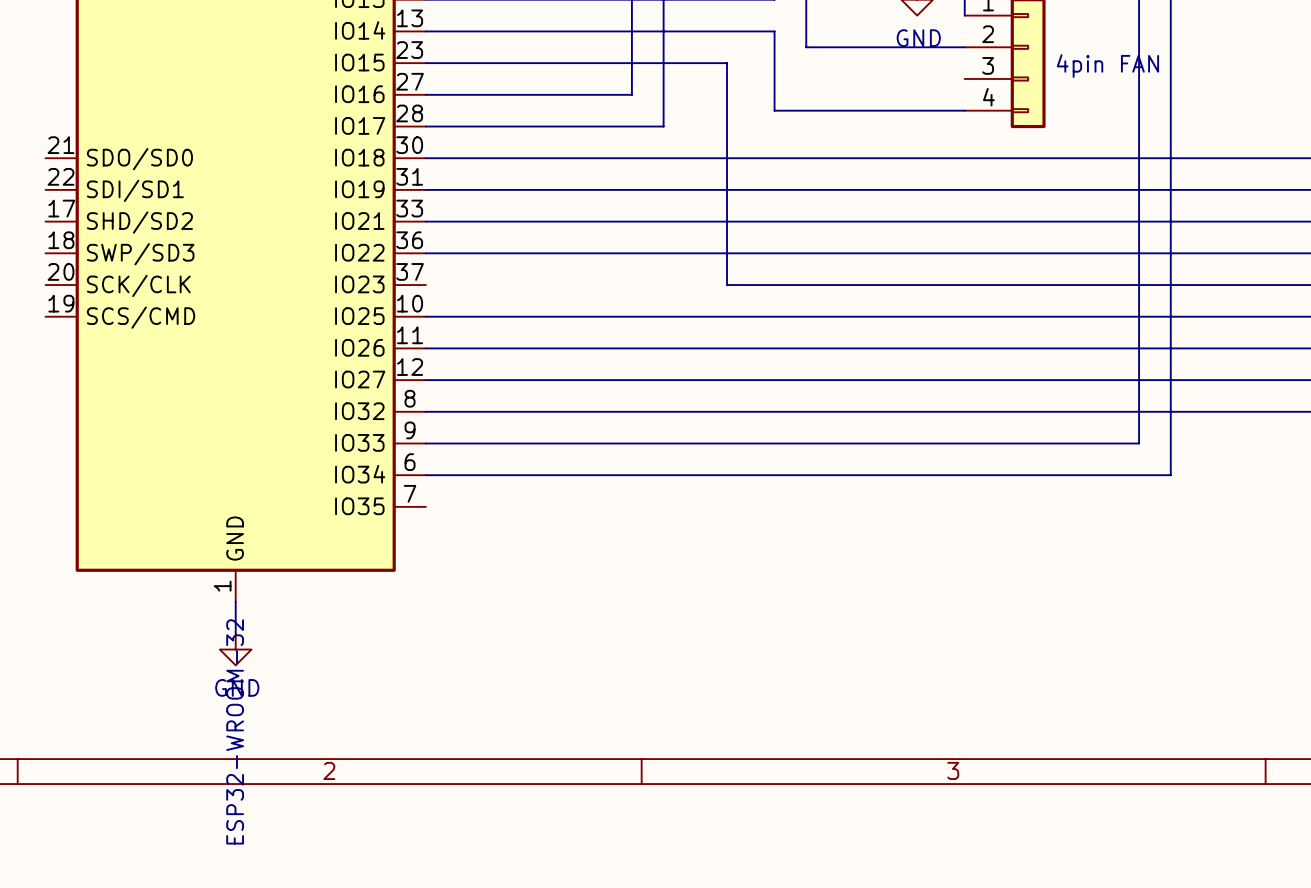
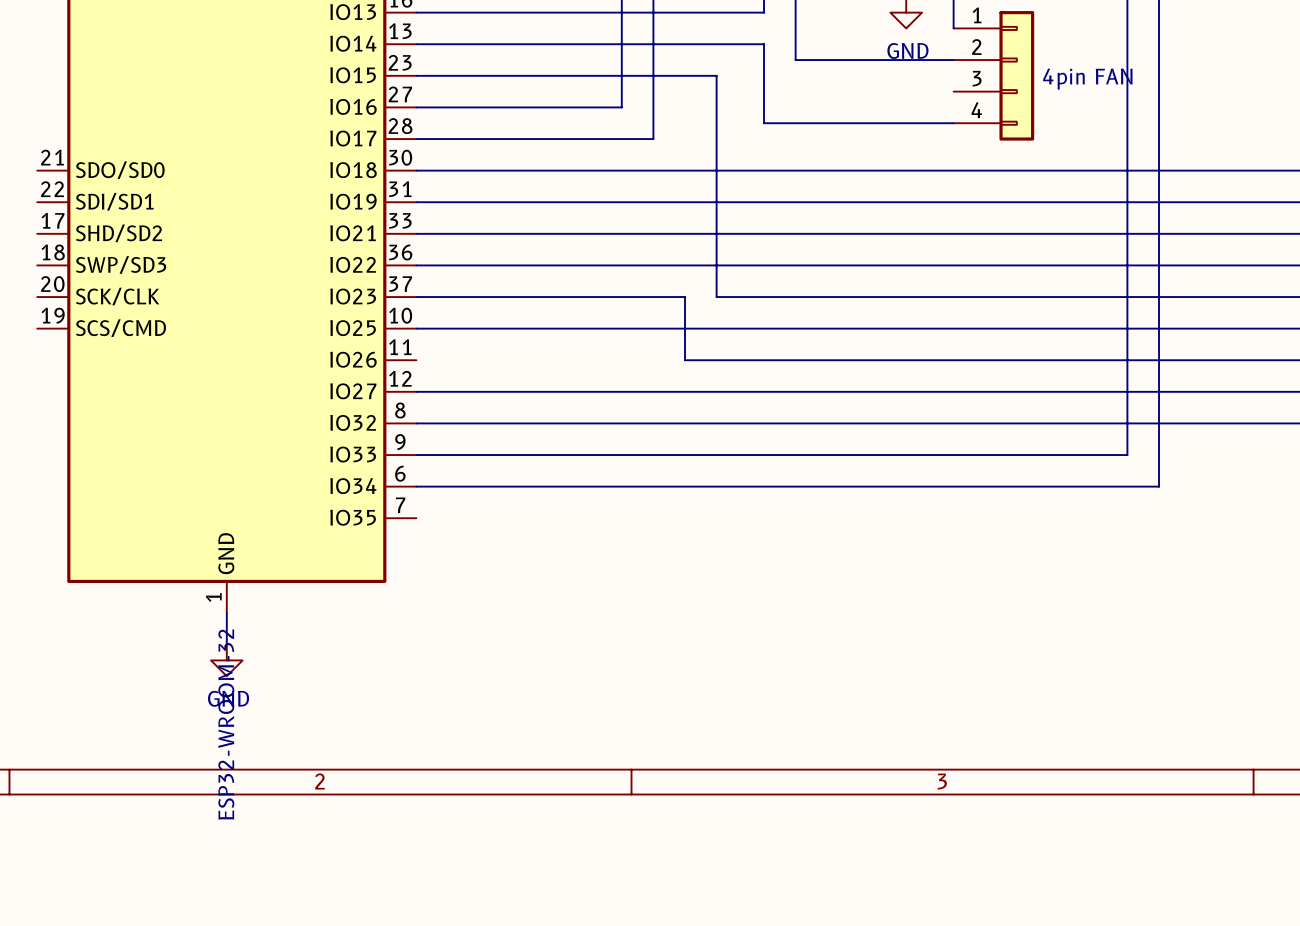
wire: (425, 348) (695, 348) -> (416, 297) (685, 297) (685, 360)

